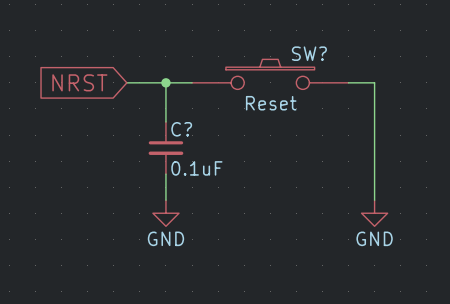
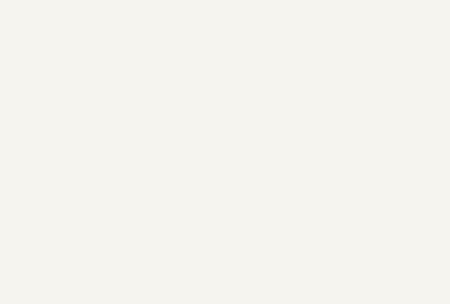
SW?: Reset (270, 74) -> none
global label: NRST (79, 82) -> none
wire: (126, 82) (192, 82) -> none
wire: (165, 82) (165, 121) -> none
junction: (165, 82) -> none
wire: (348, 82) (374, 82) (374, 200) -> none
C?: 0.1uF (165, 148) -> none
wire: (165, 174) (165, 200) -> none
power symbol: GND (165, 213) -> none
power symbol: GND (374, 213) -> none

